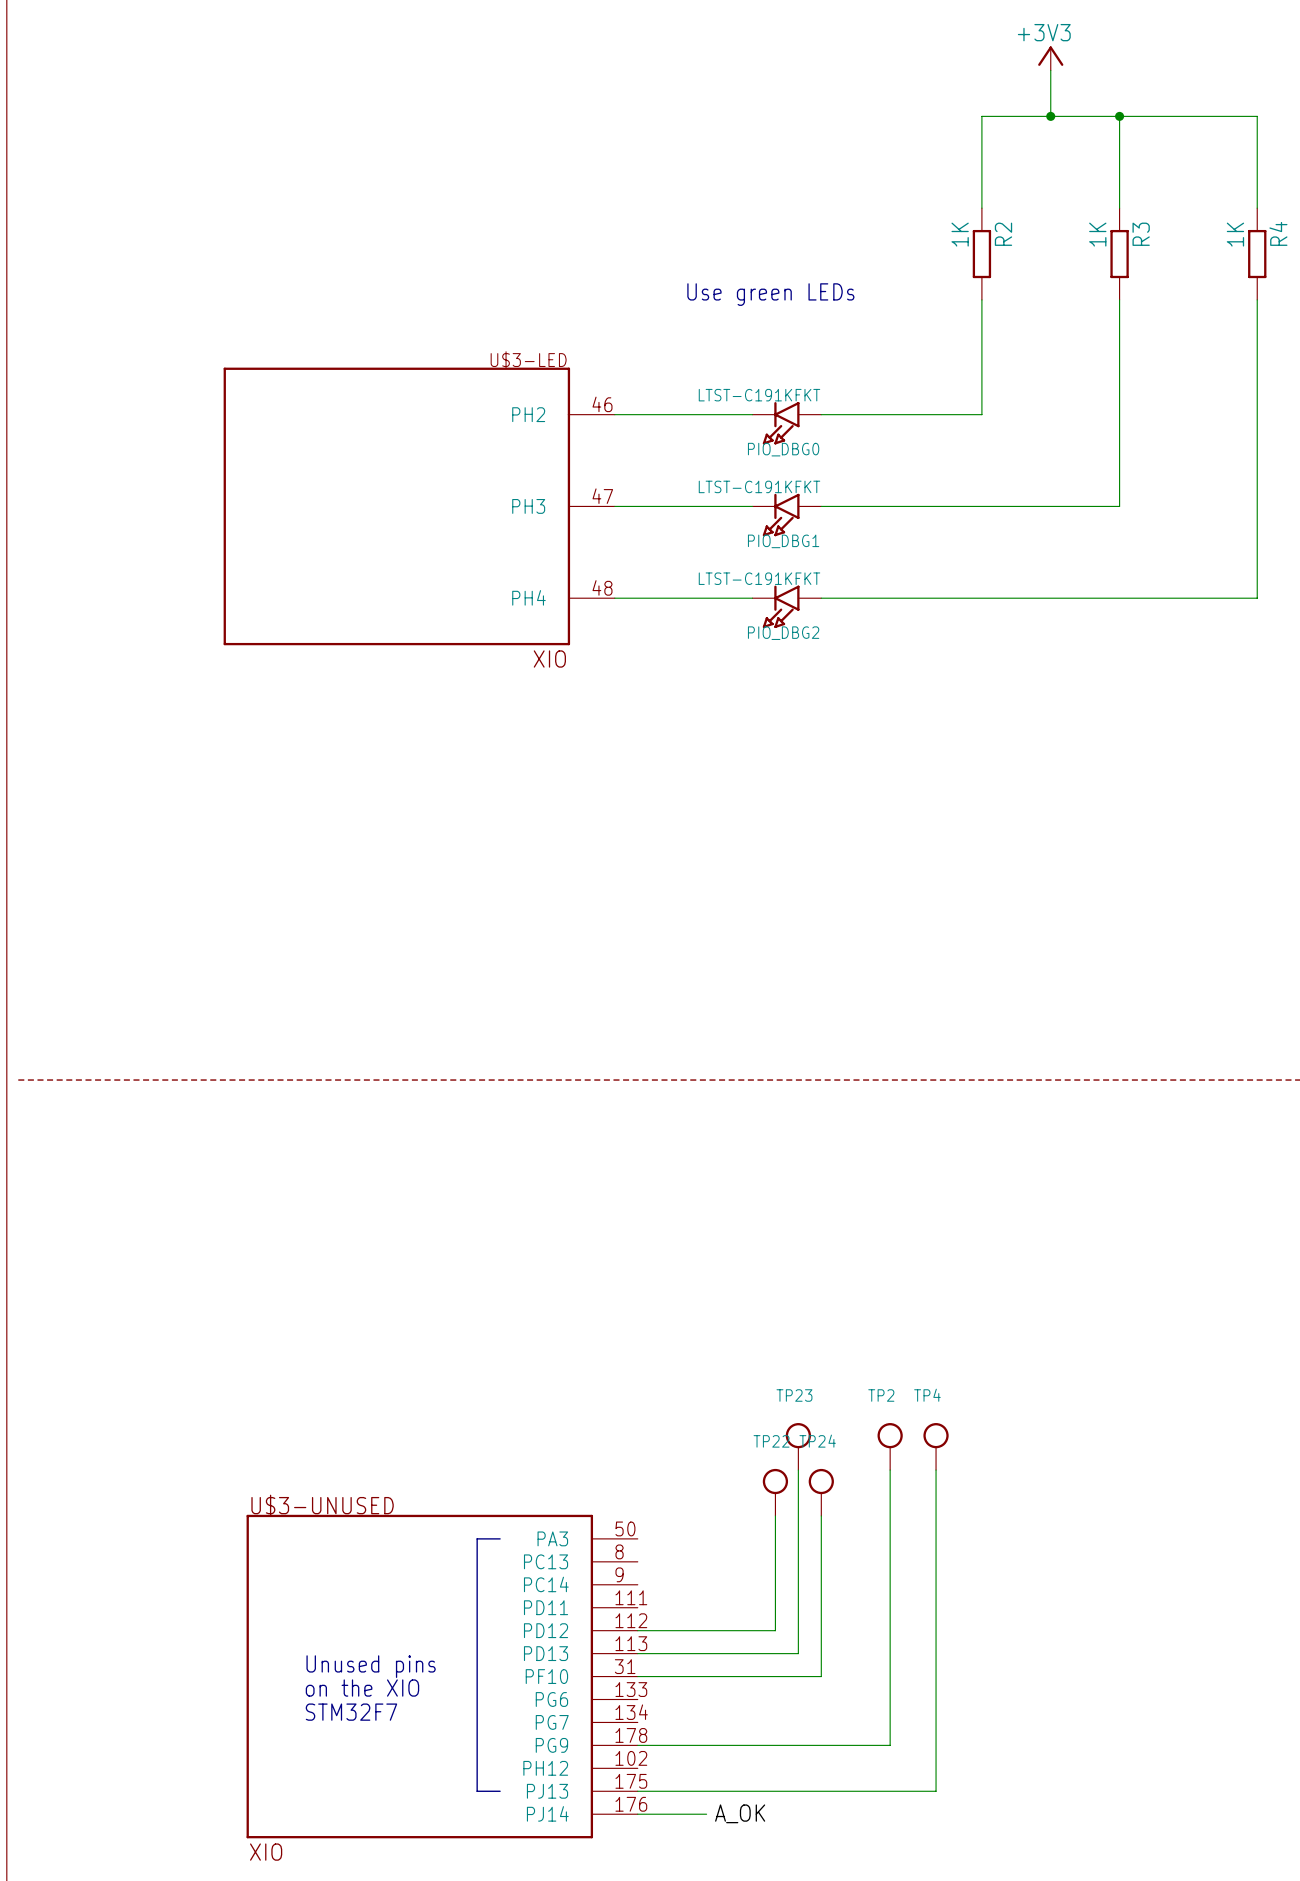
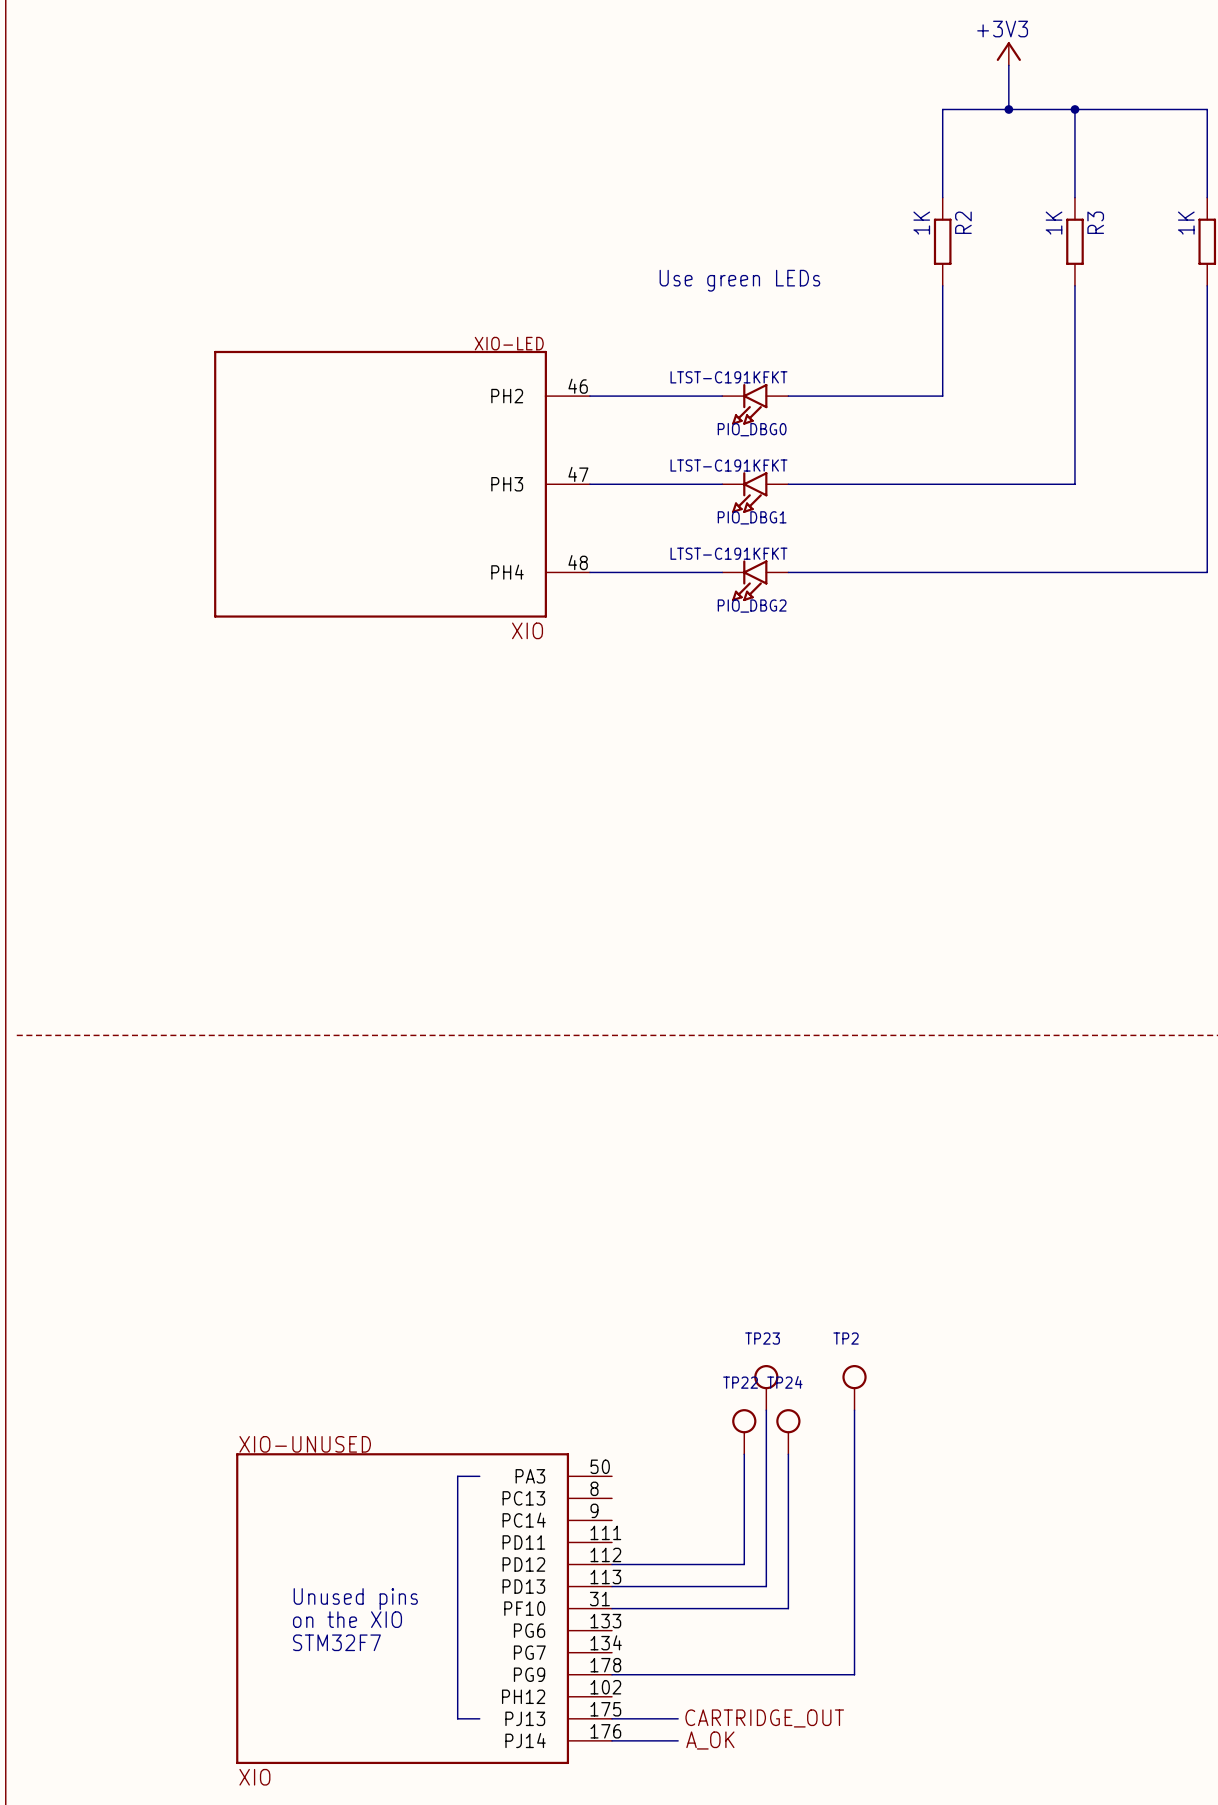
U$3-LED name: U$3-LED (528, 360) -> XIO-LED (509, 343)
TP4: (936, 1446) -> none
wire: (936, 1470) (936, 1791) (706, 1791) -> none
U$3-UNUSED name: U$3-UNUSED (322, 1505) -> XIO-UNUSED (305, 1444)
label: none -> CARTRIDGE_OUT (764, 1718)

